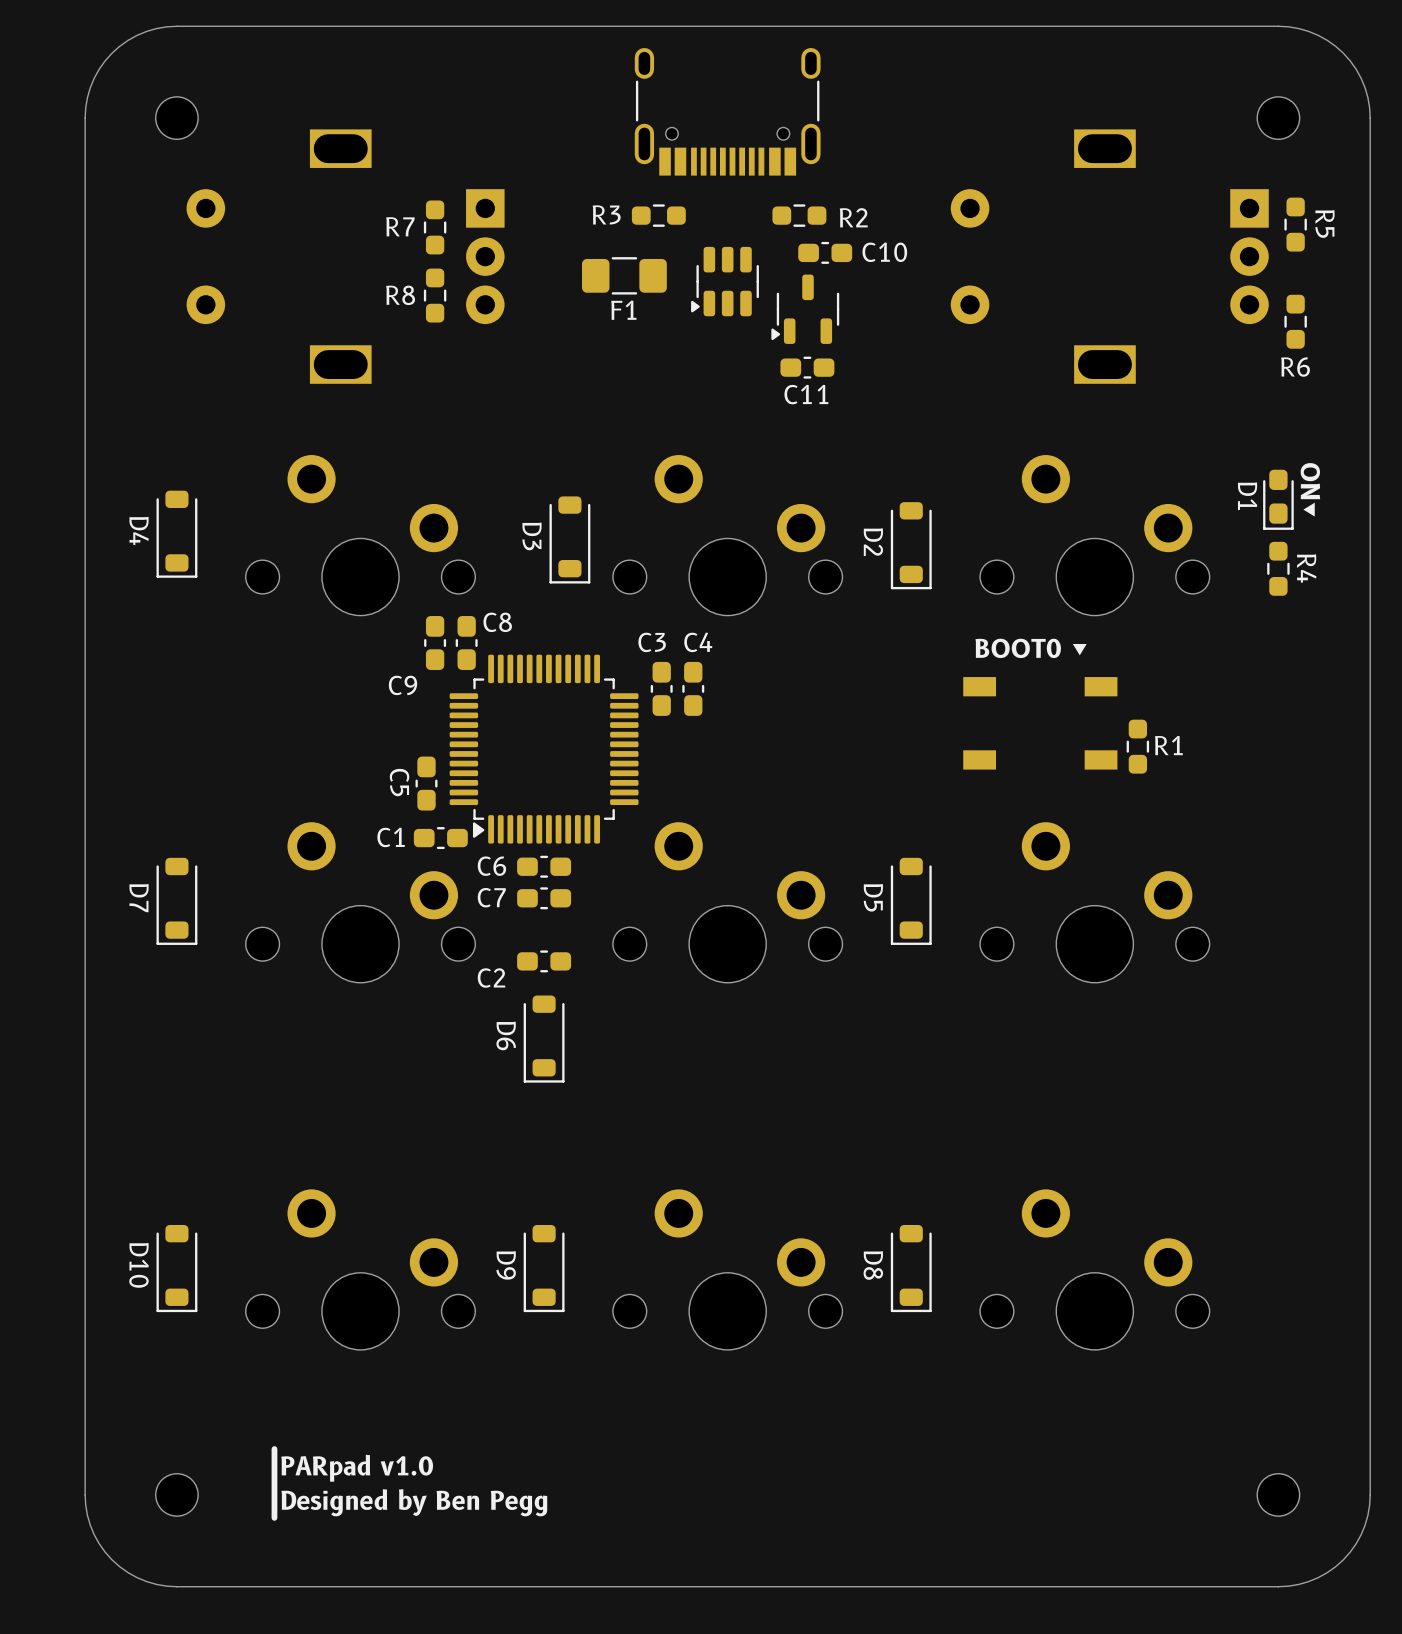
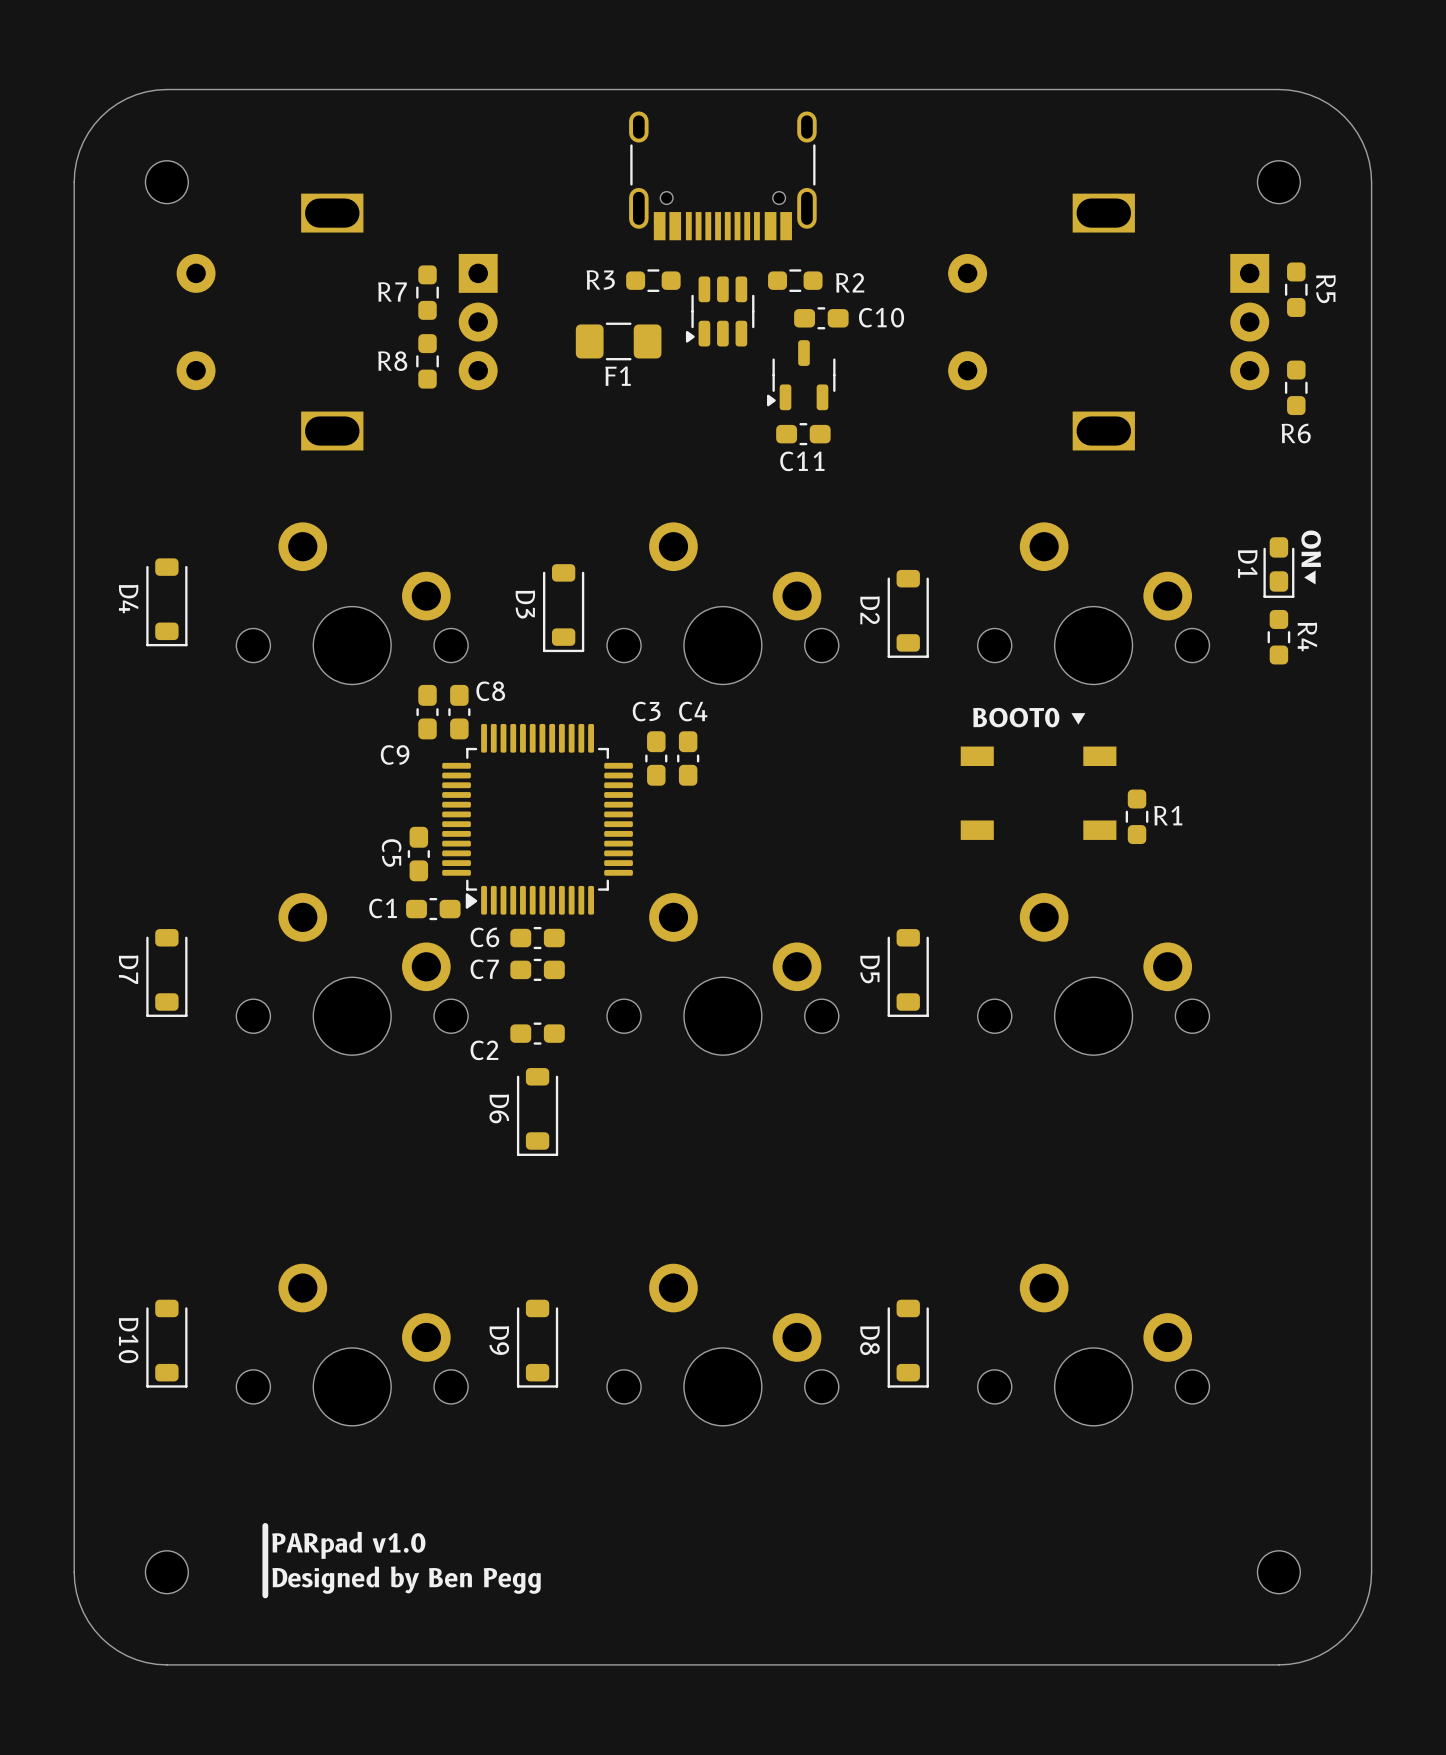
part position: (724, 281) -> (720, 311)

